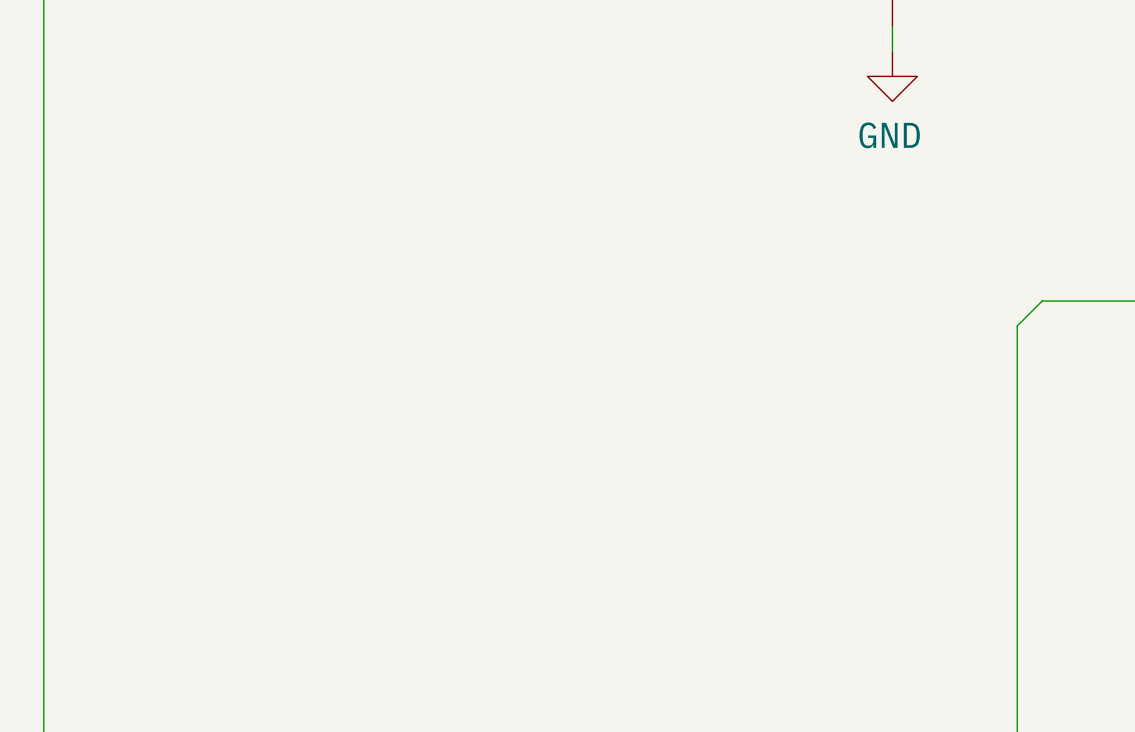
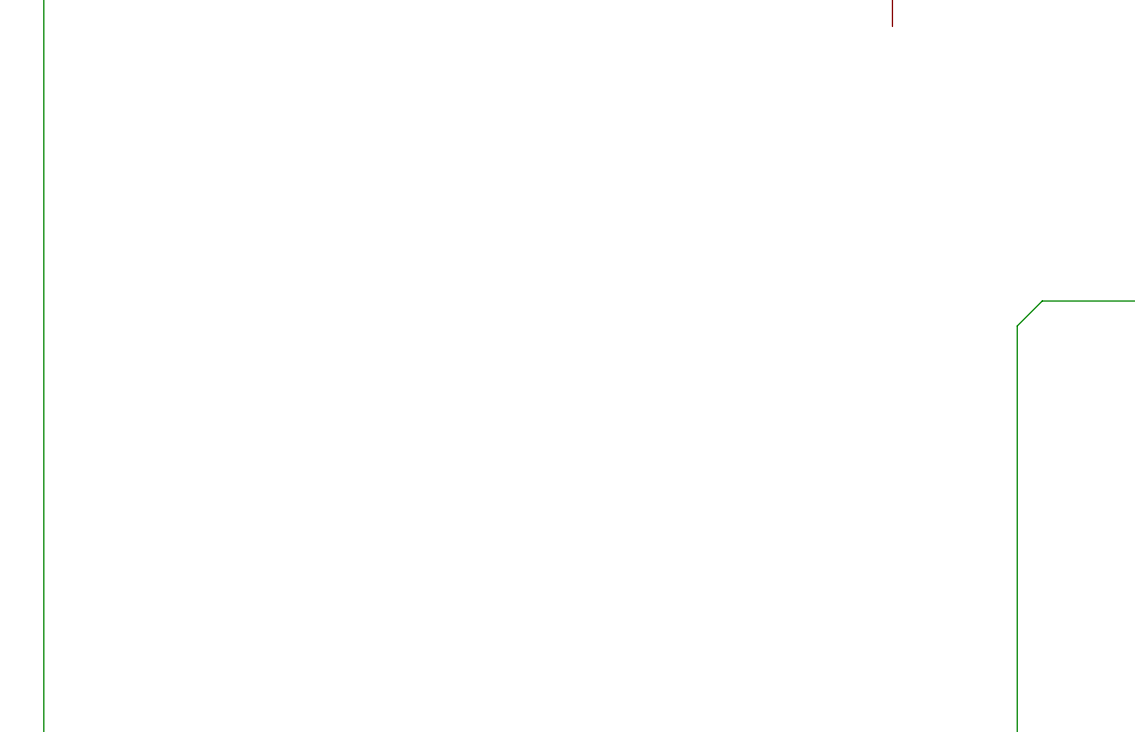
wire: (892, 26) (892, 51) -> none
power symbol: GND (892, 76) -> none

